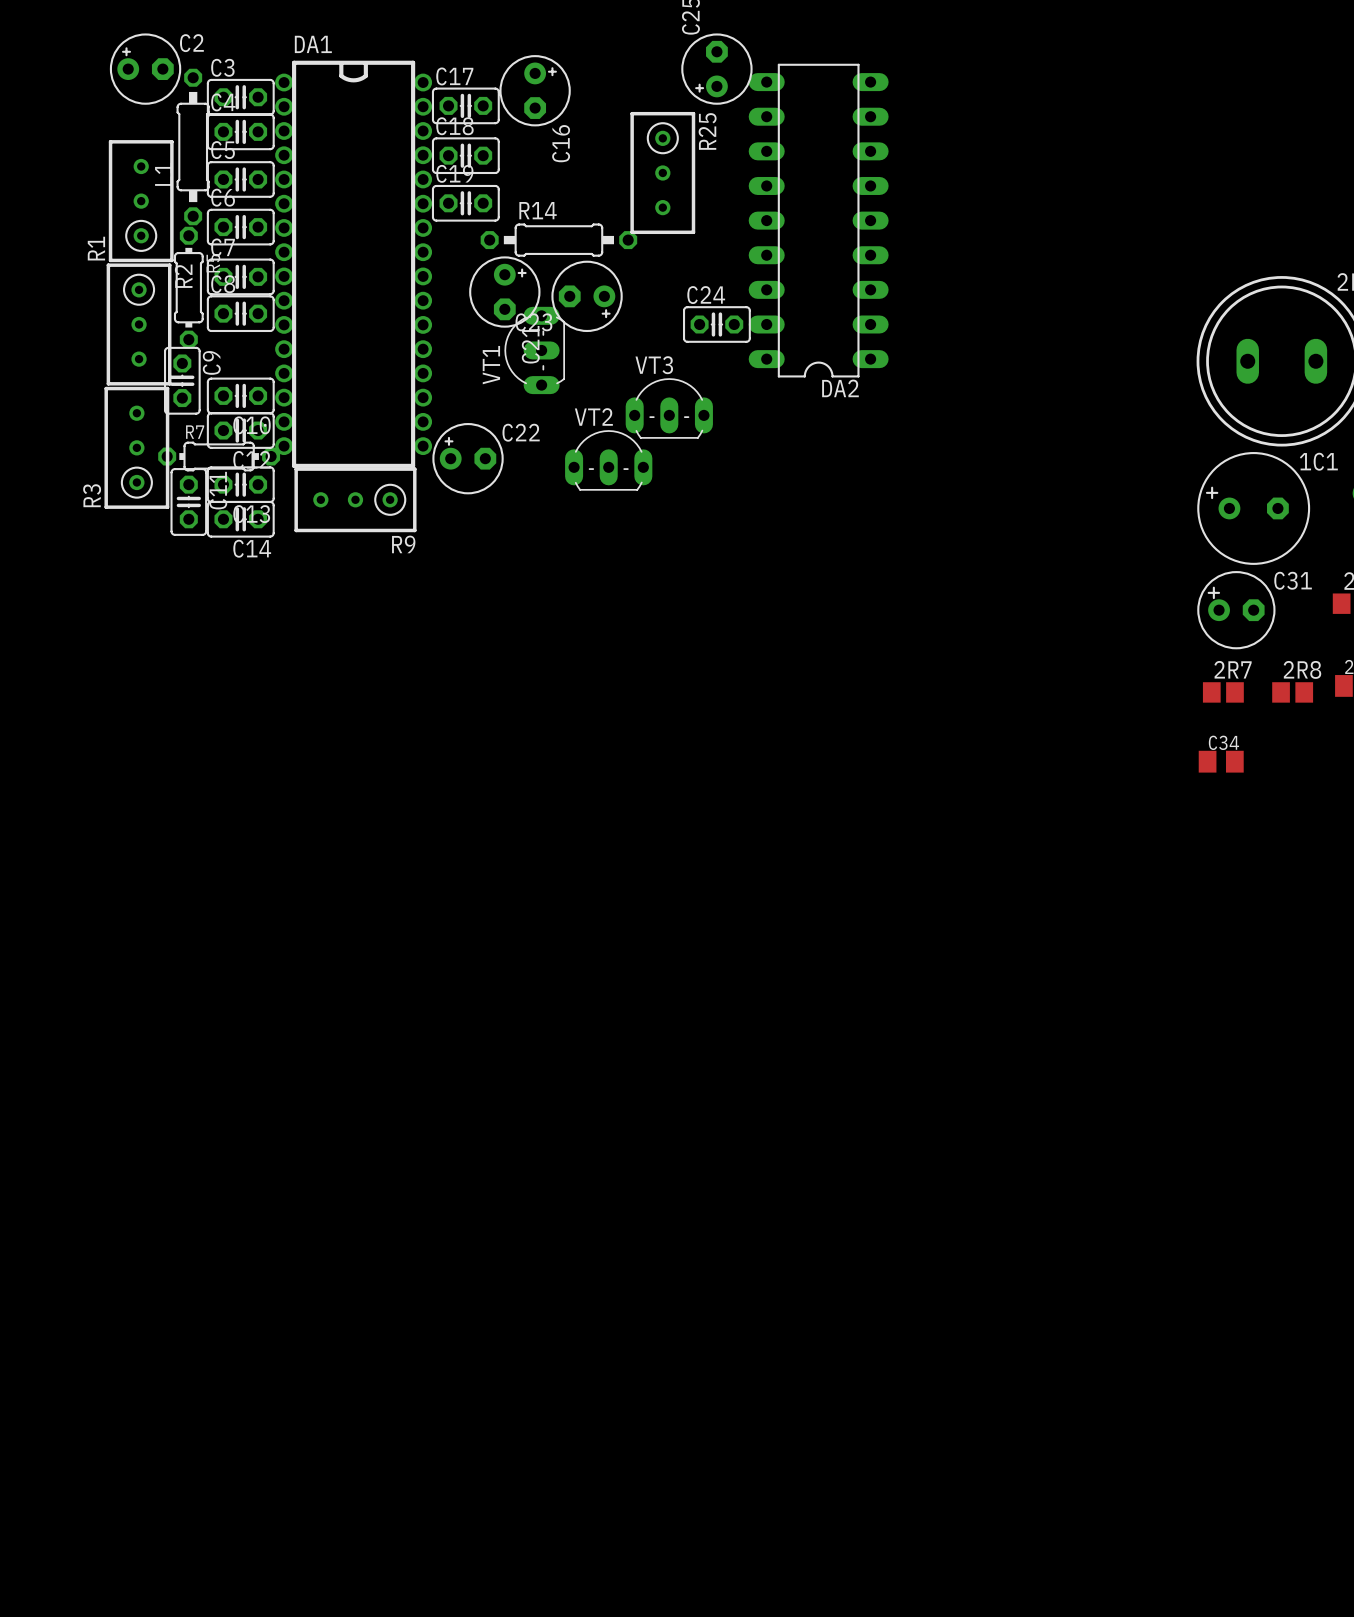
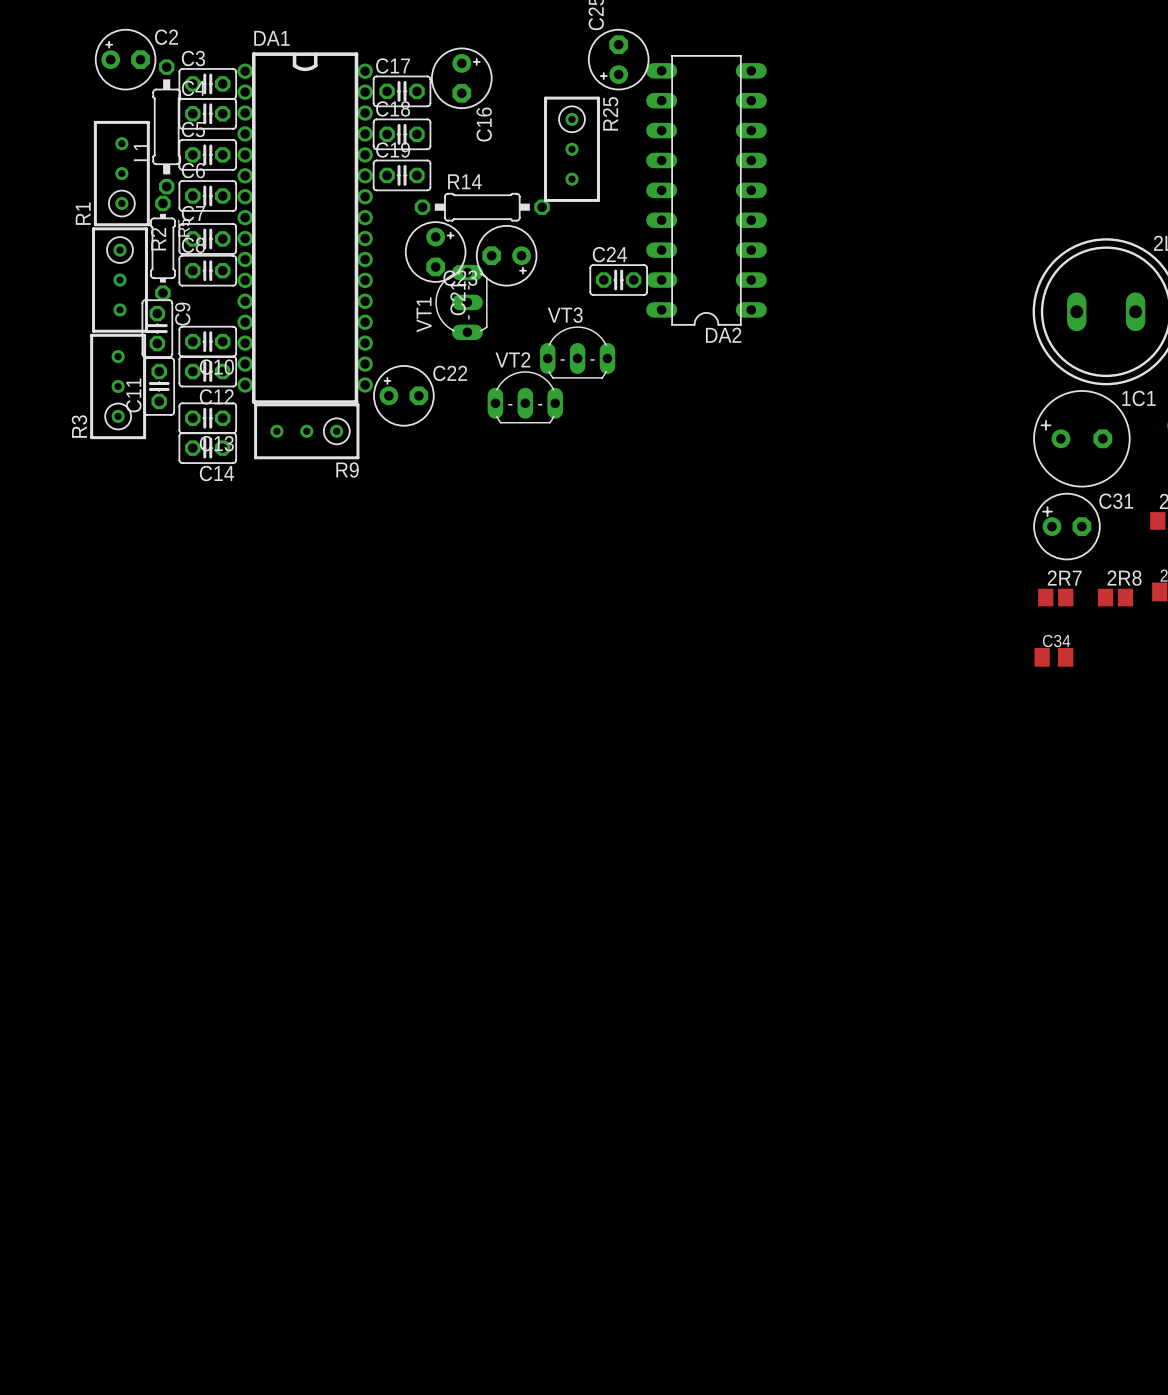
R7: (219, 456) -> none
C11 name position: C11 (218, 490) -> C11 (133, 395)
C11 position: (188, 501) -> (159, 386)

